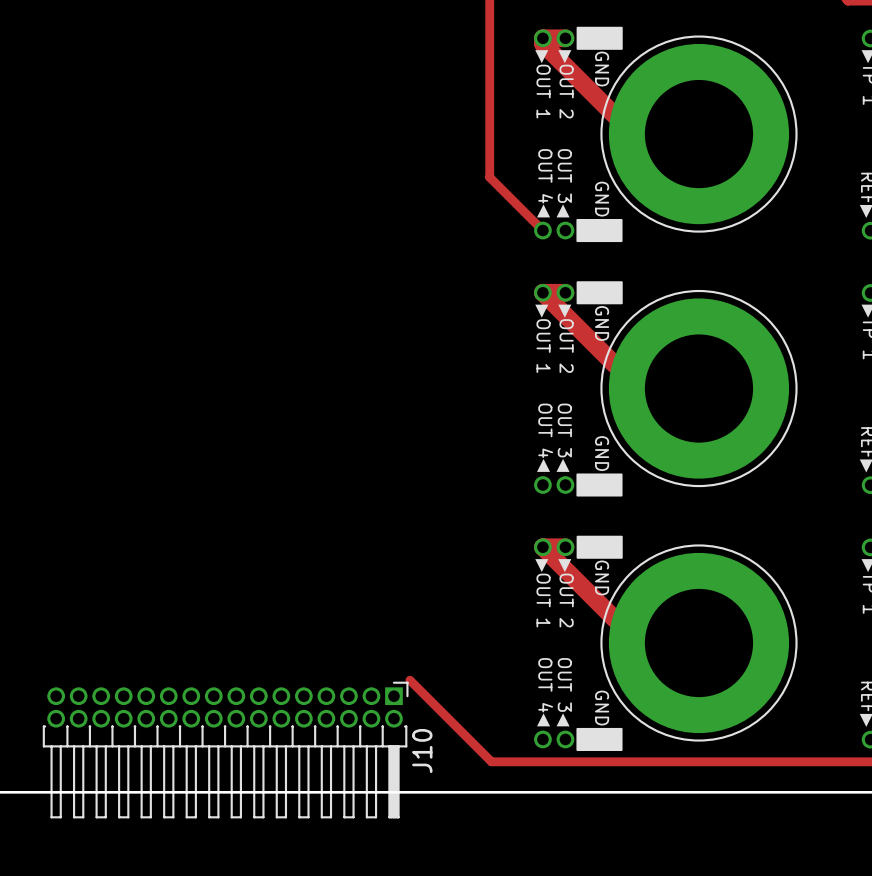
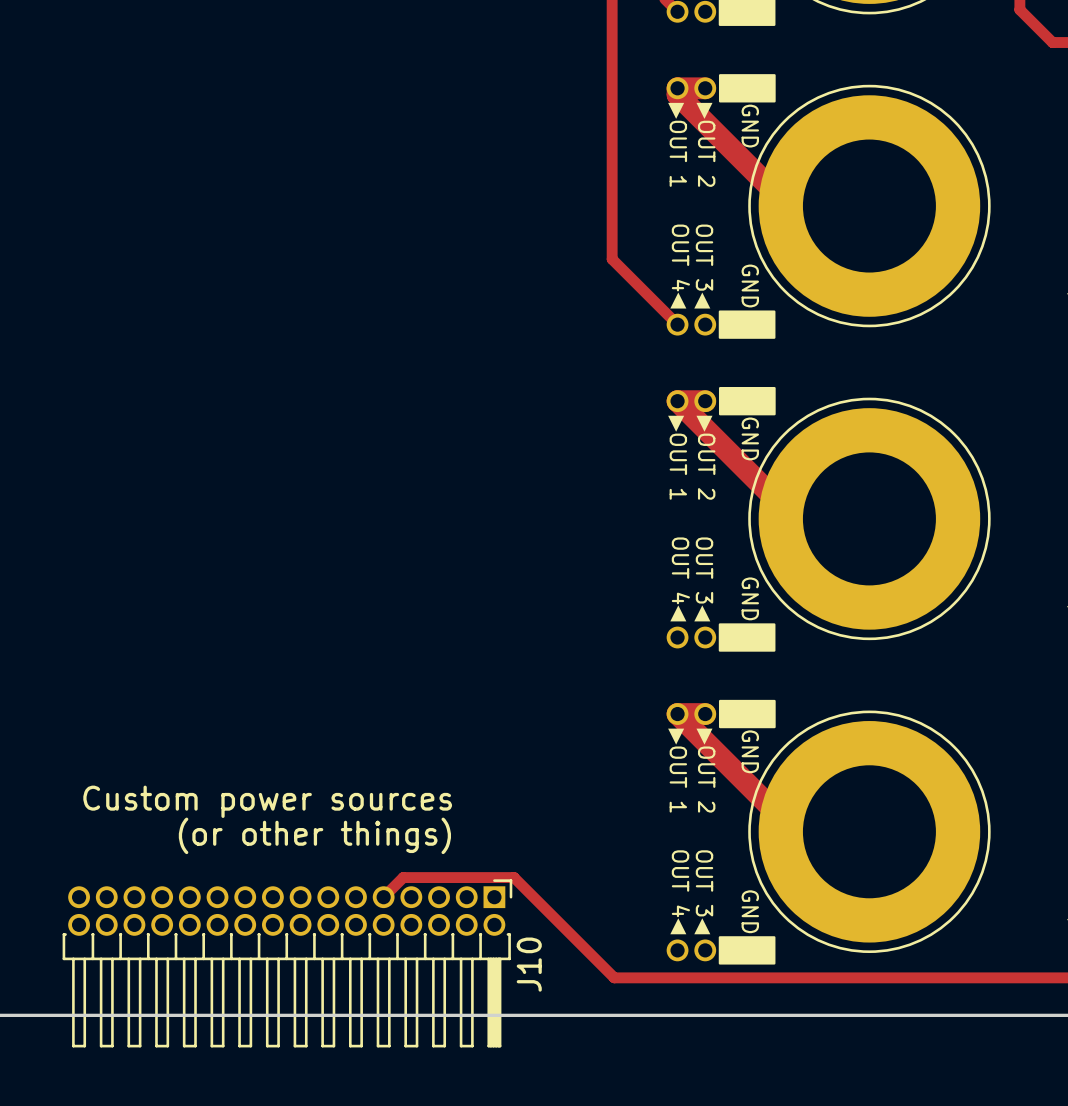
text: none -> Custom power sources (267, 801)
text: none -> (or other things) (314, 835)
track: none -> (514, 877) (403, 877) (383, 897)

